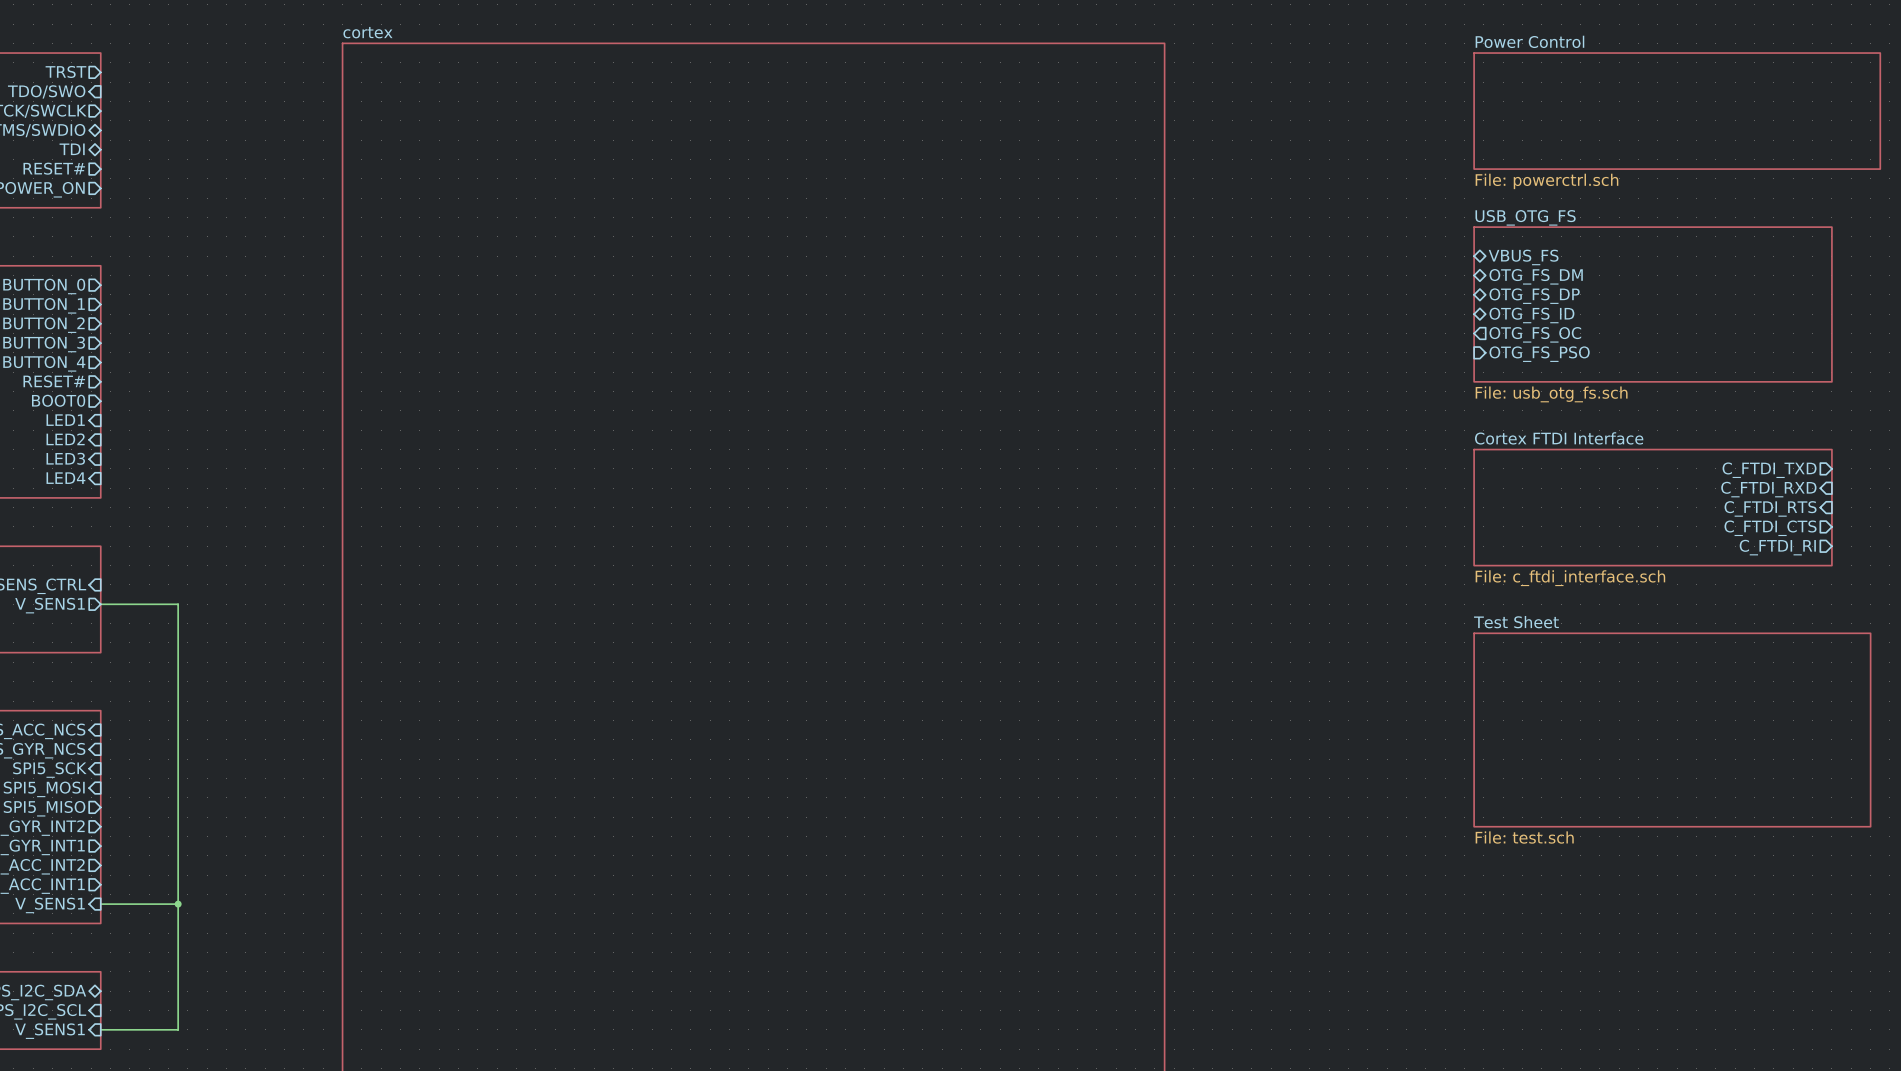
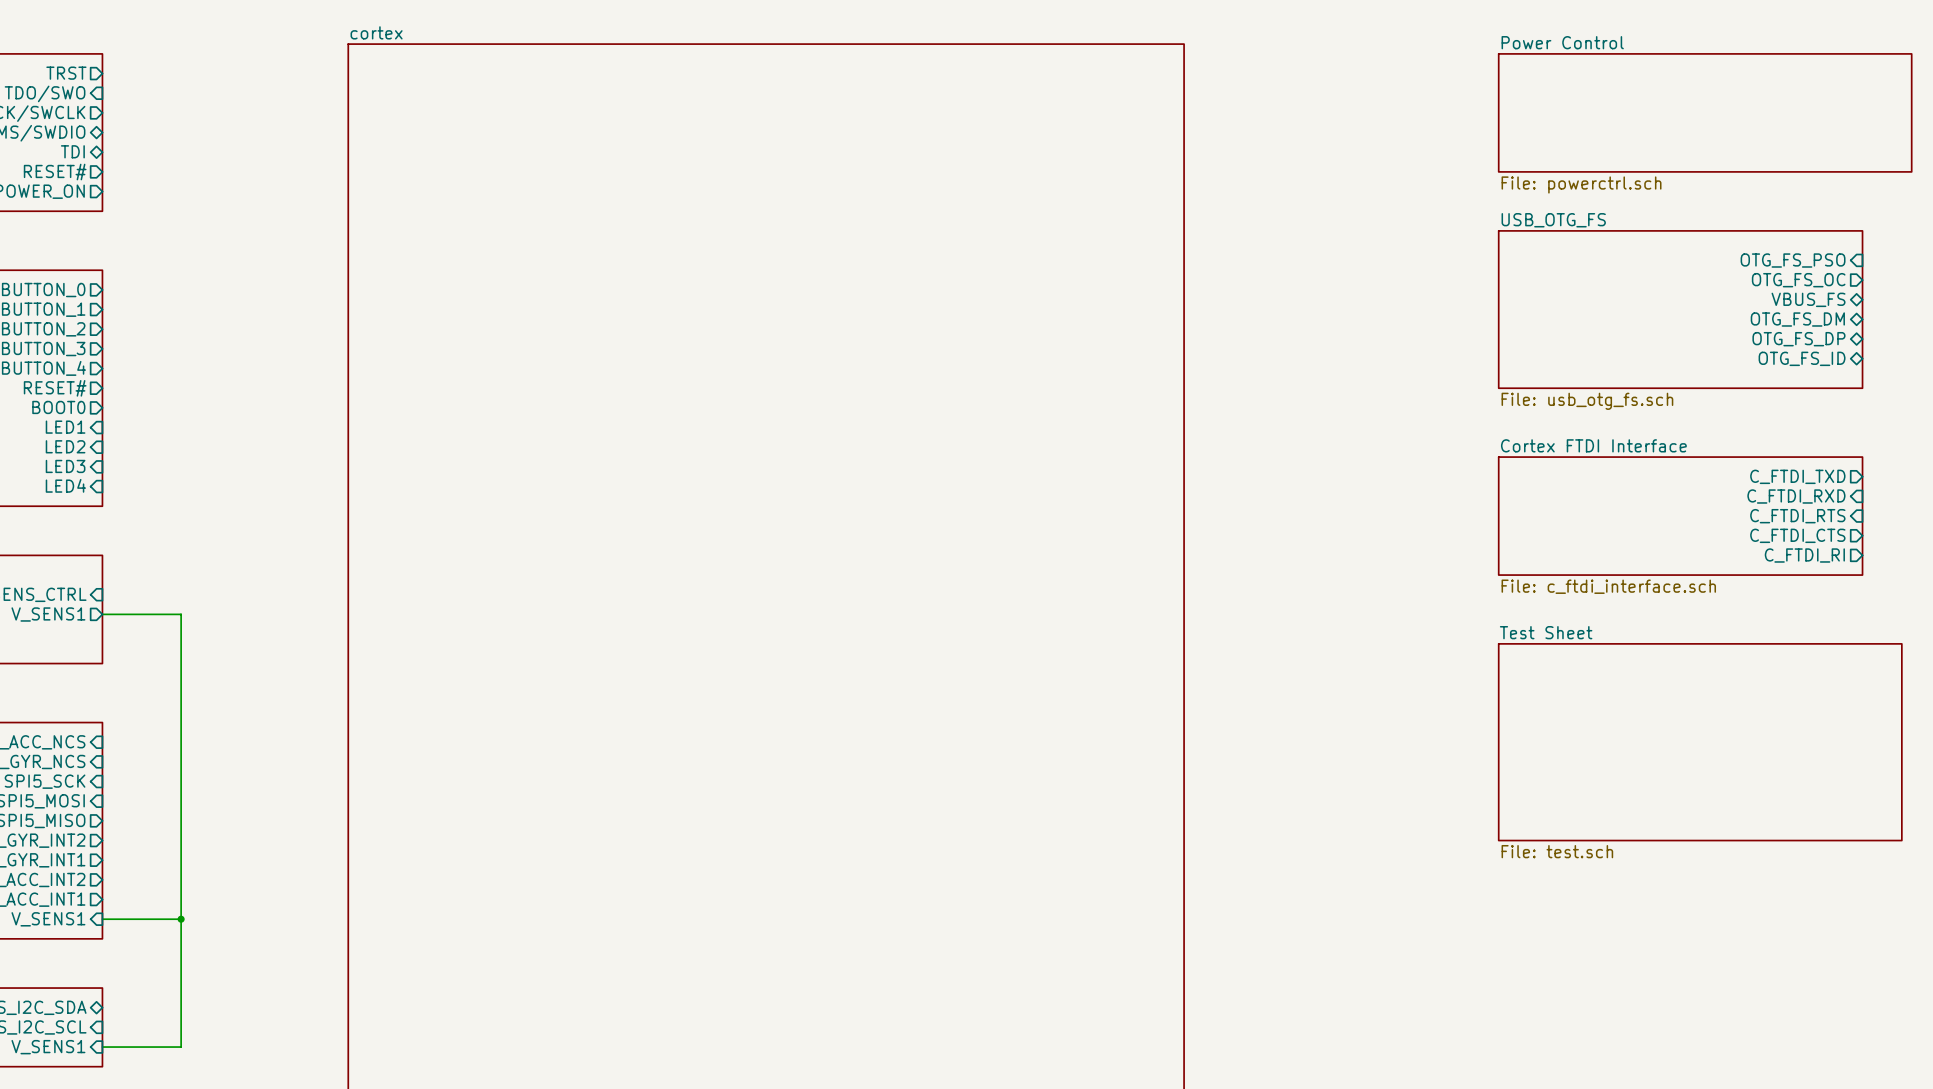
sheet pin: VBUS_FS (1523, 257) -> none
sheet pin: none -> OTG_FS_PSO (1793, 260)
sheet pin: OTG_FS_DM (1536, 276) -> none
sheet pin: none -> OTG_FS_OC (1798, 280)
sheet pin: OTG_FS_DP (1534, 296) -> none
sheet pin: none -> VBUS_FS (1808, 299)
sheet pin: OTG_FS_ID (1531, 315) -> none
sheet pin: none -> OTG_FS_DM (1797, 319)
sheet pin: OTG_FS_OC (1535, 334) -> none
sheet pin: none -> OTG_FS_DP (1798, 339)
sheet pin: OTG_FS_PSO (1539, 354) -> none
sheet pin: none -> OTG_FS_ID (1802, 358)

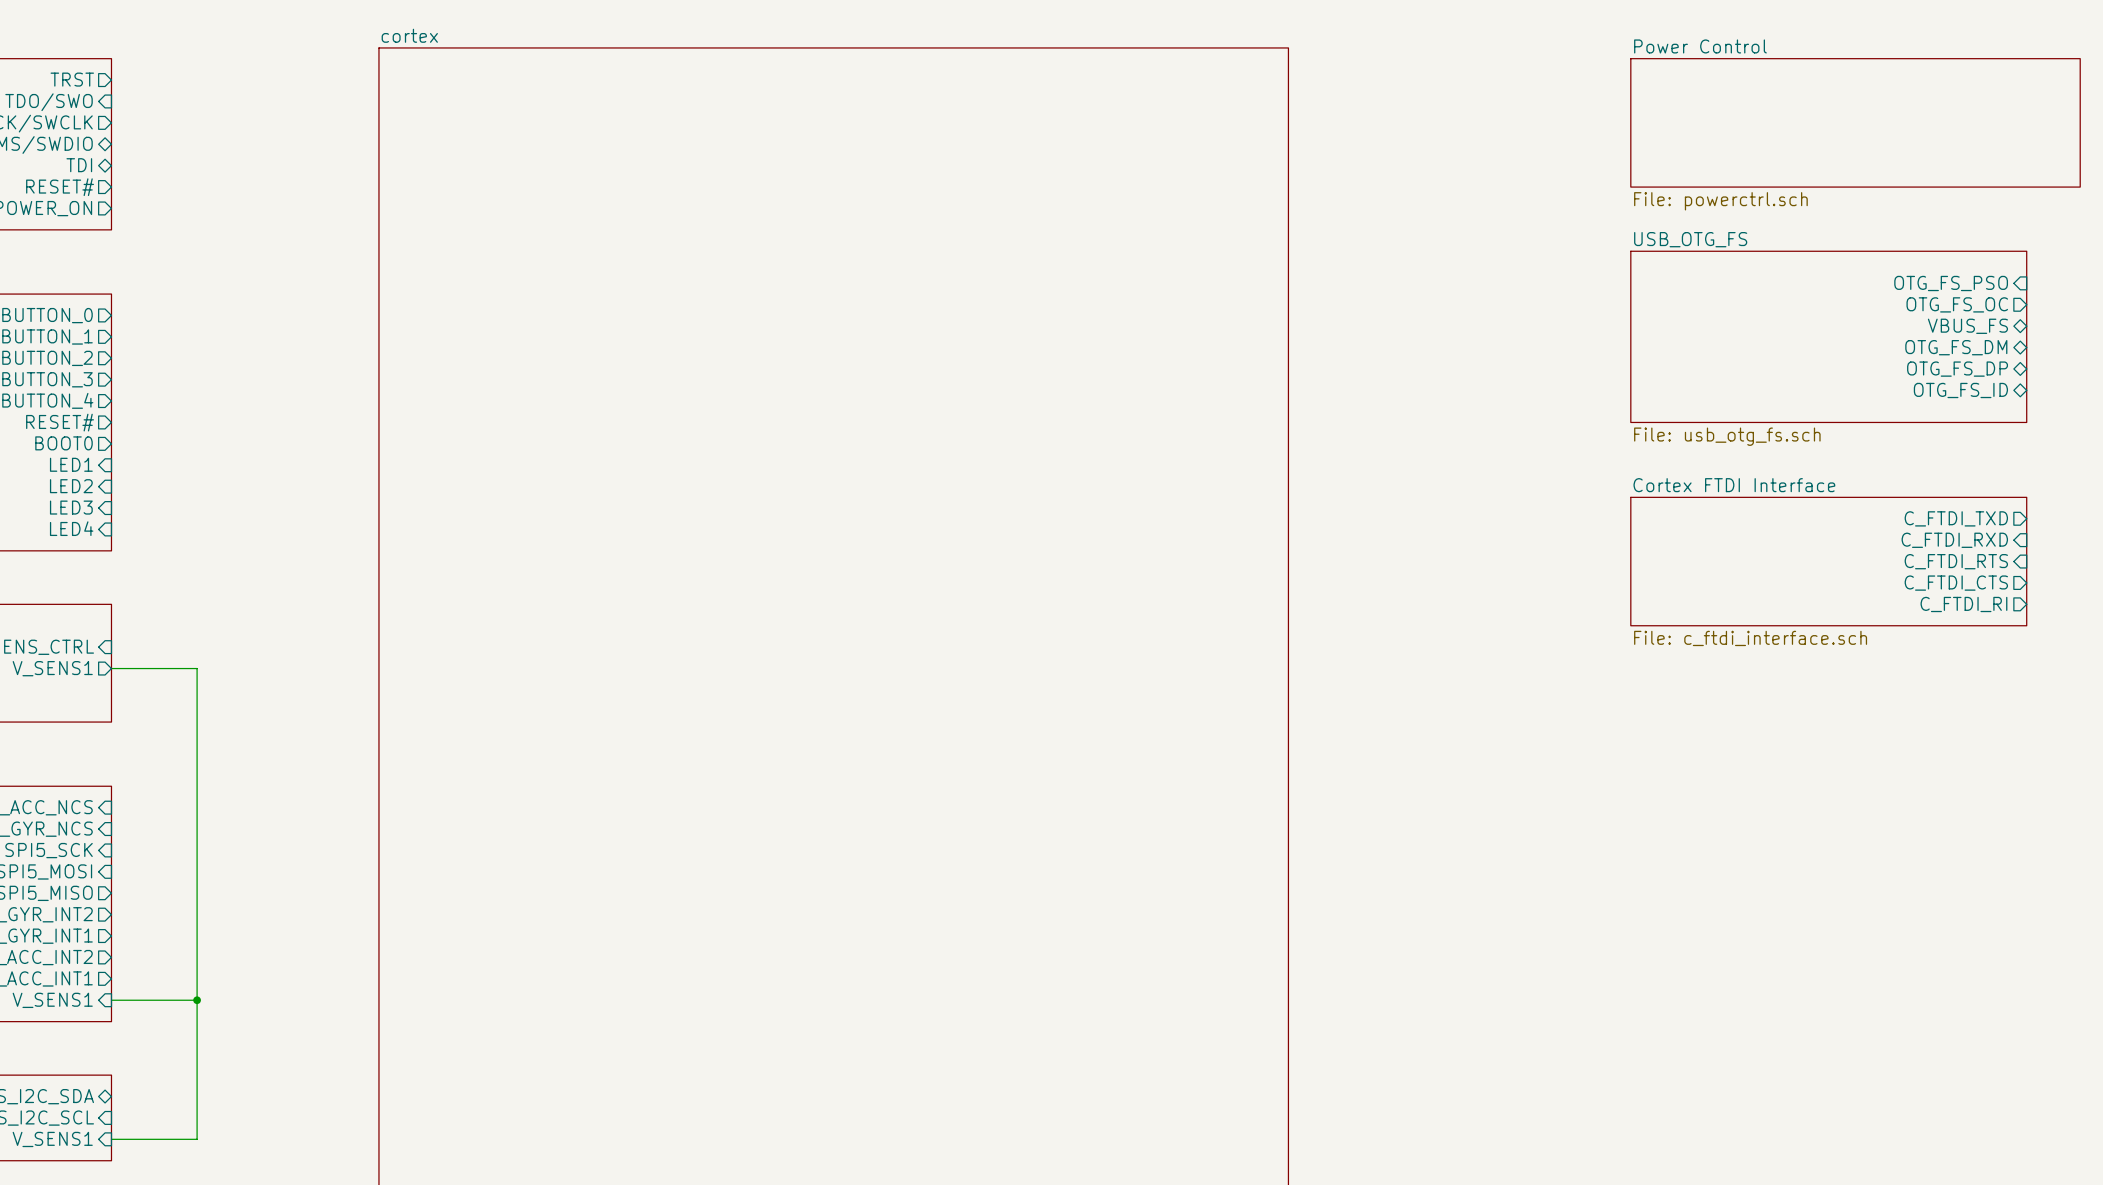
sheet Test Sheet: File: test.sch (1700, 742) -> none

